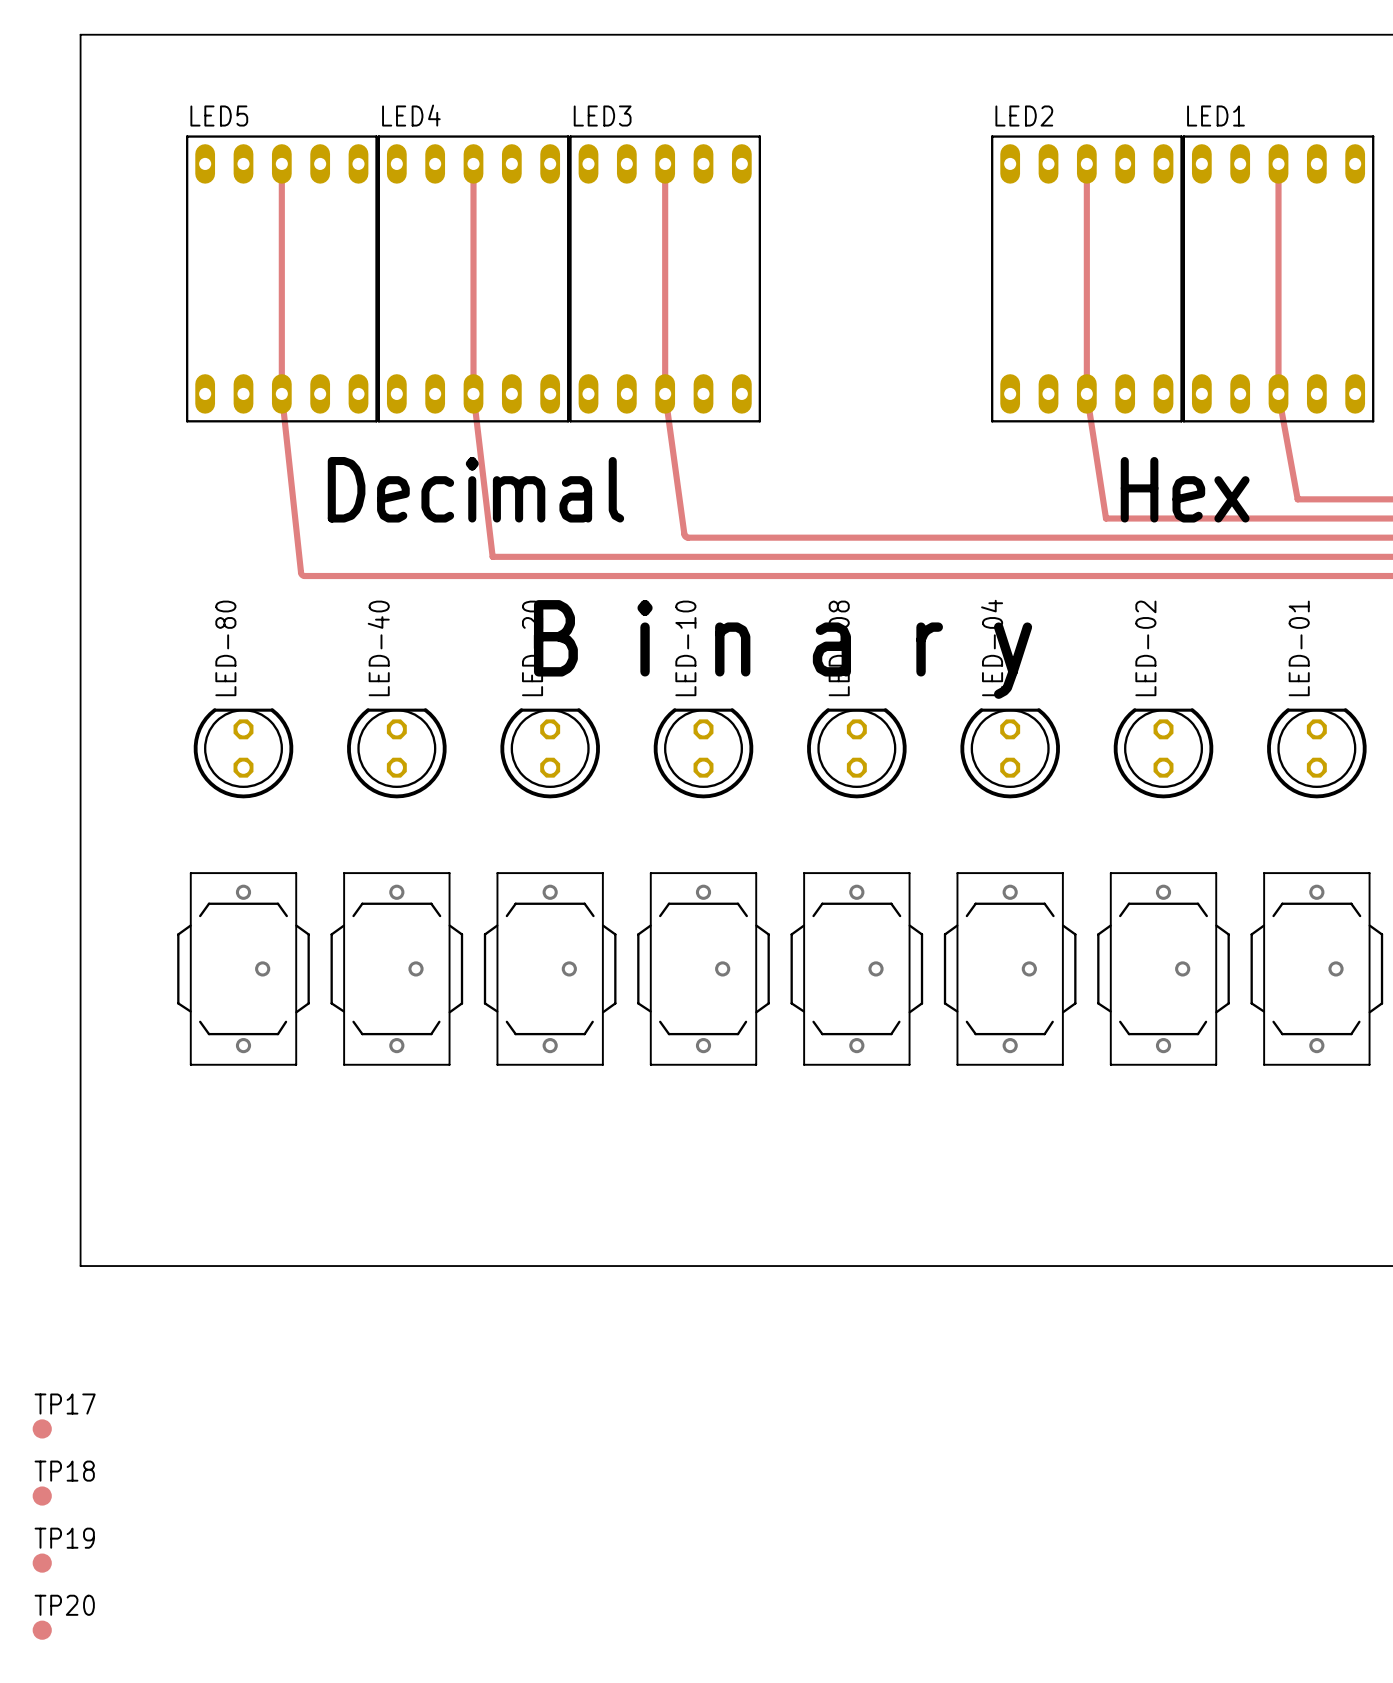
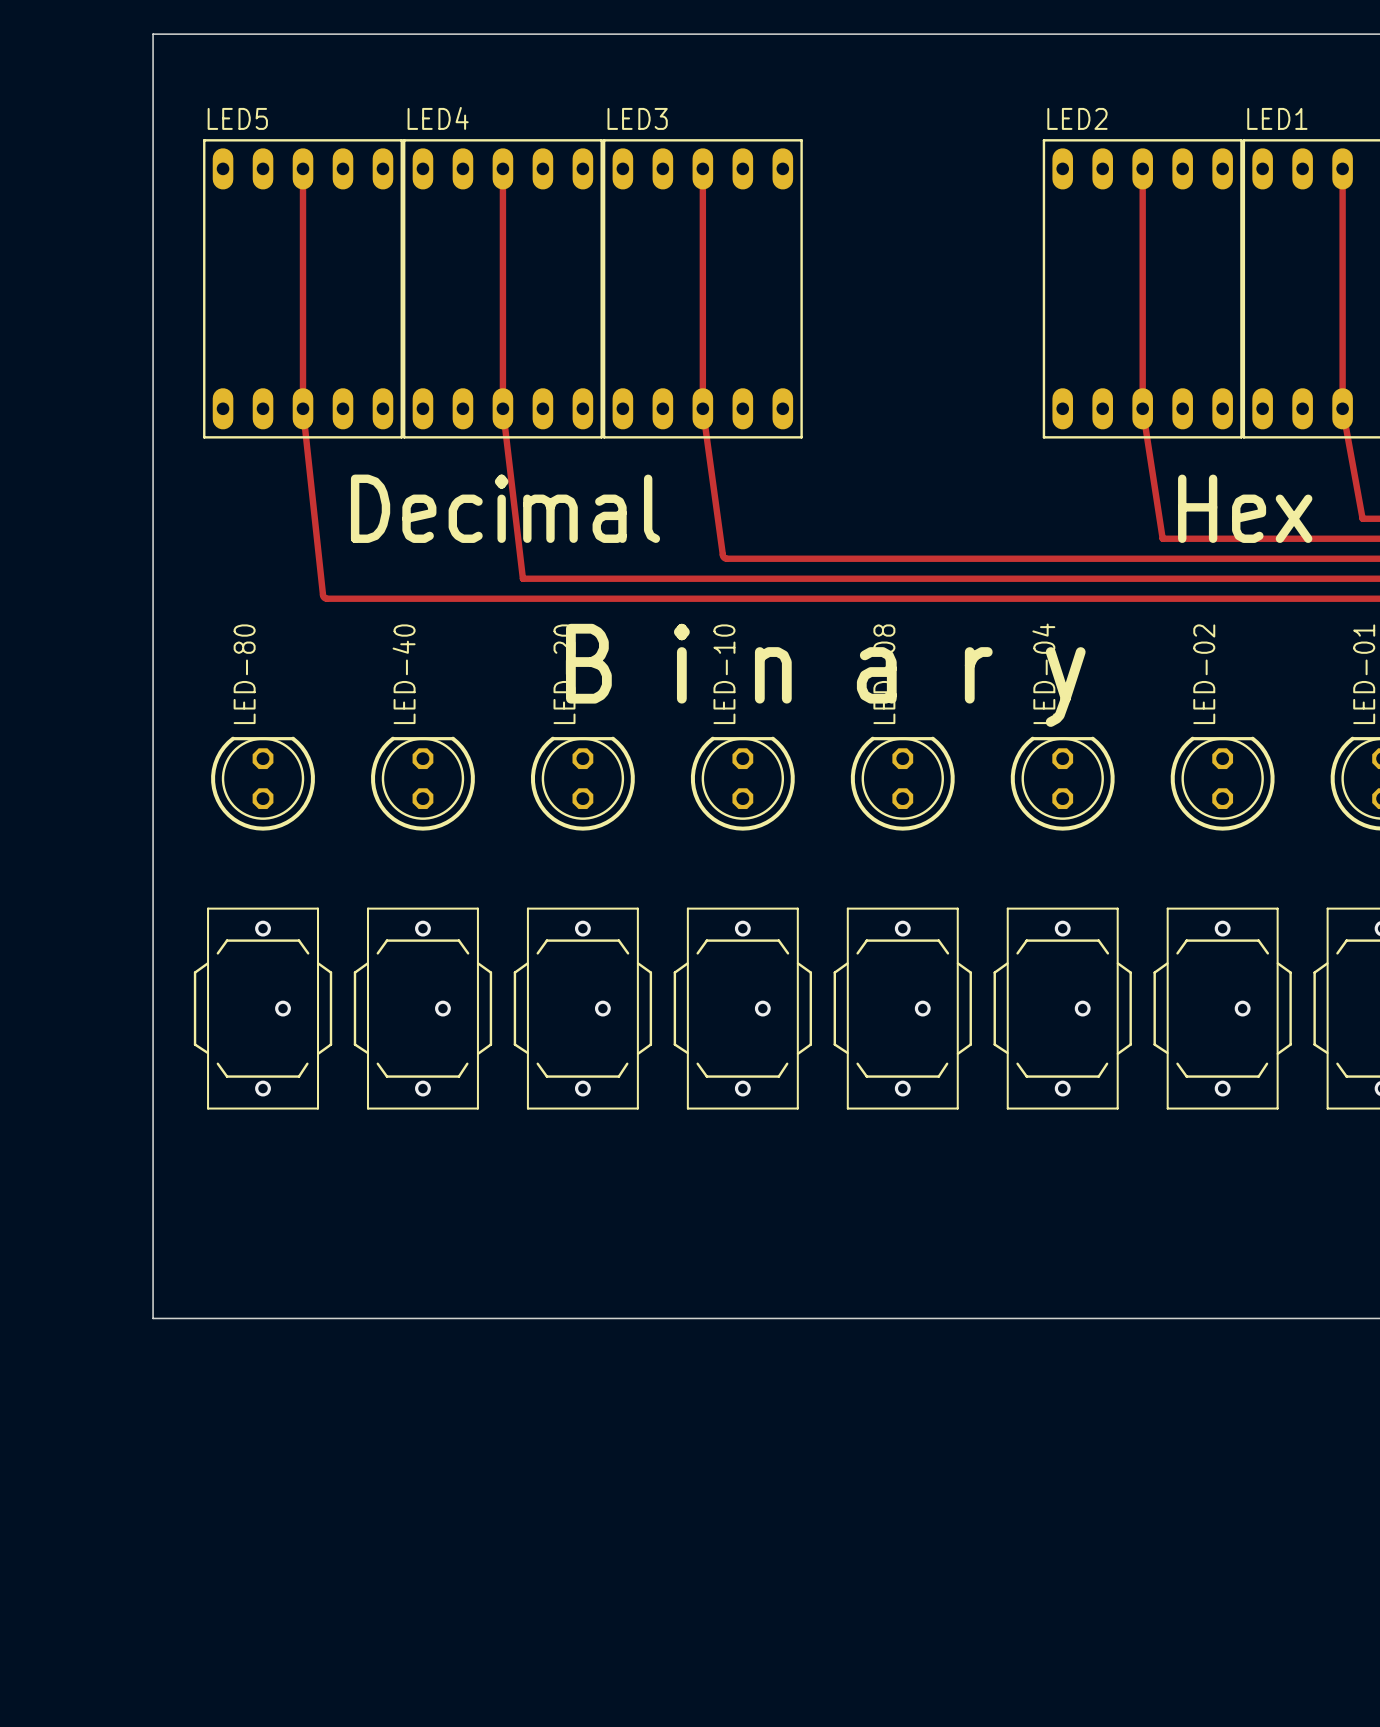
board edge: (138, 34) (80, 34) (80, 1266) (138, 1266) -> (153, 34) (153, 1318)
TP17: (42, 1428) -> none
TP18: (42, 1496) -> none
TP19: (42, 1563) -> none
TP20: (42, 1630) -> none

